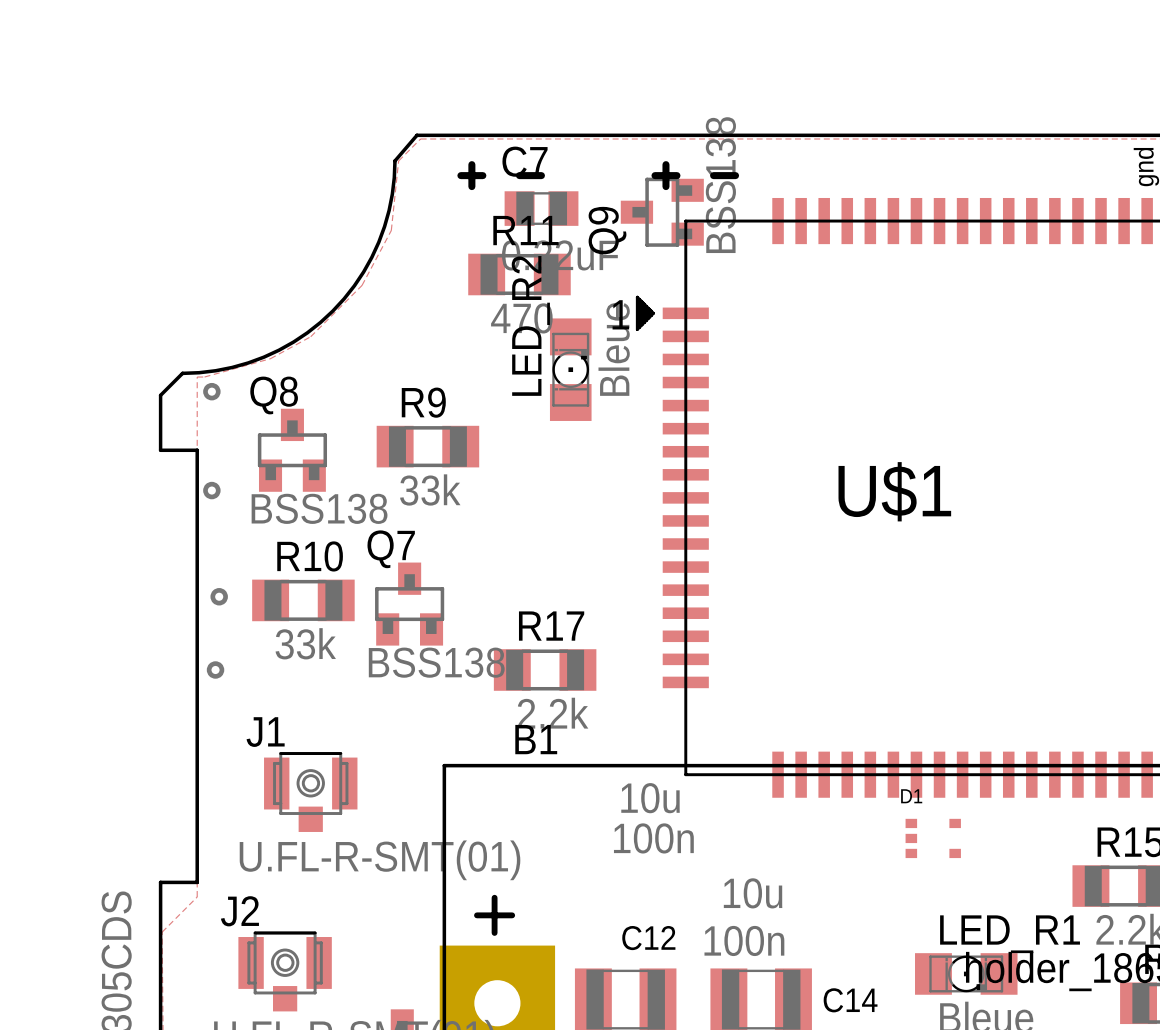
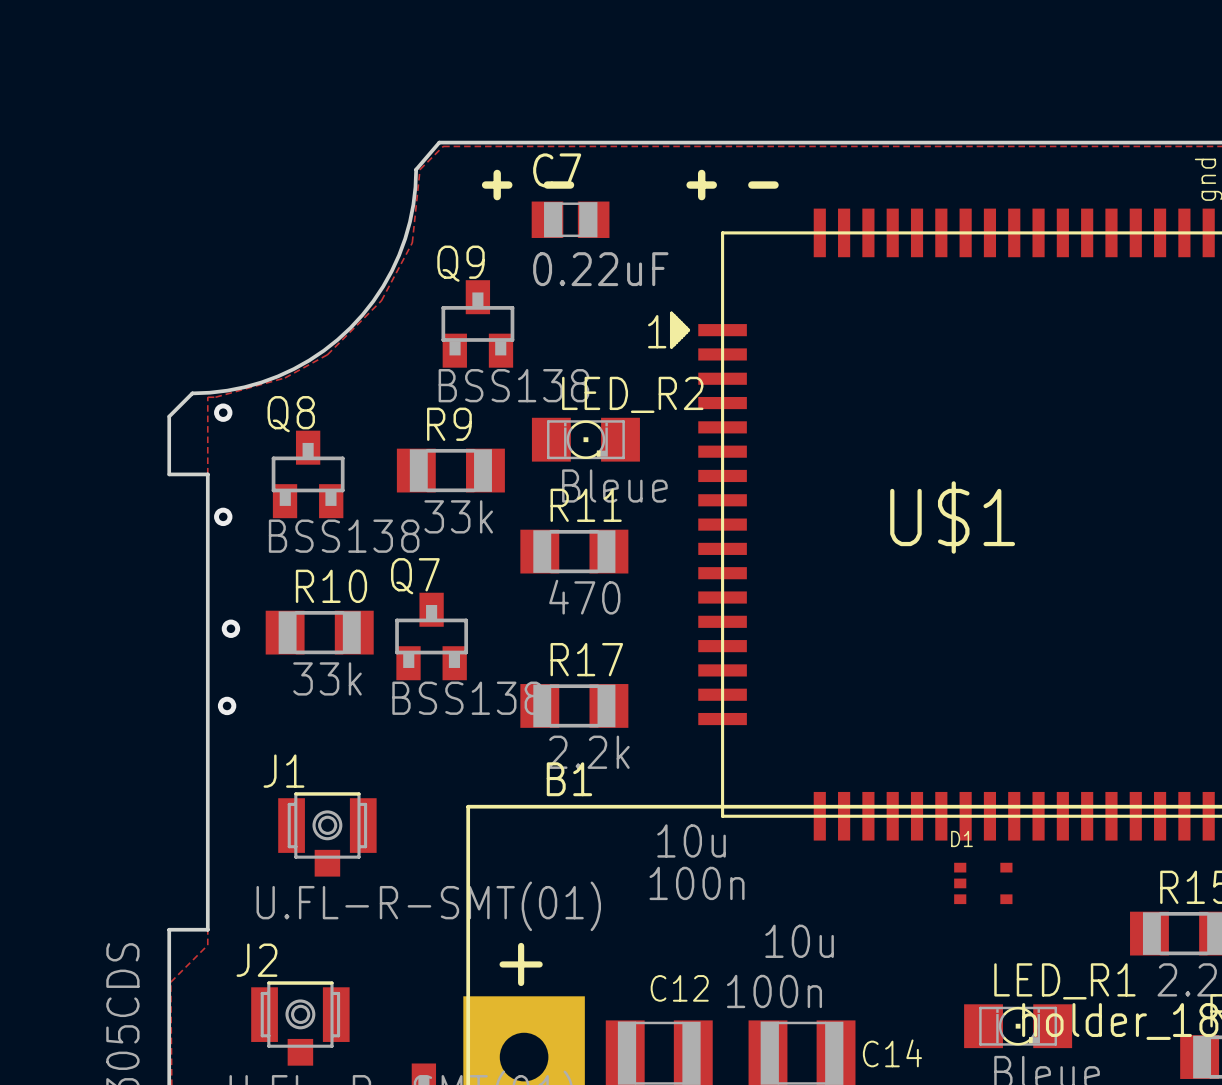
Q9 rotation: 0° (662, 212) -> 90° clockwise (477, 323)
Q9 position: (662, 212) -> (477, 323)
R11 position: (519, 274) -> (574, 551)
LED_R2 rotation: 0° (570, 369) -> 90° clockwise (585, 439)

